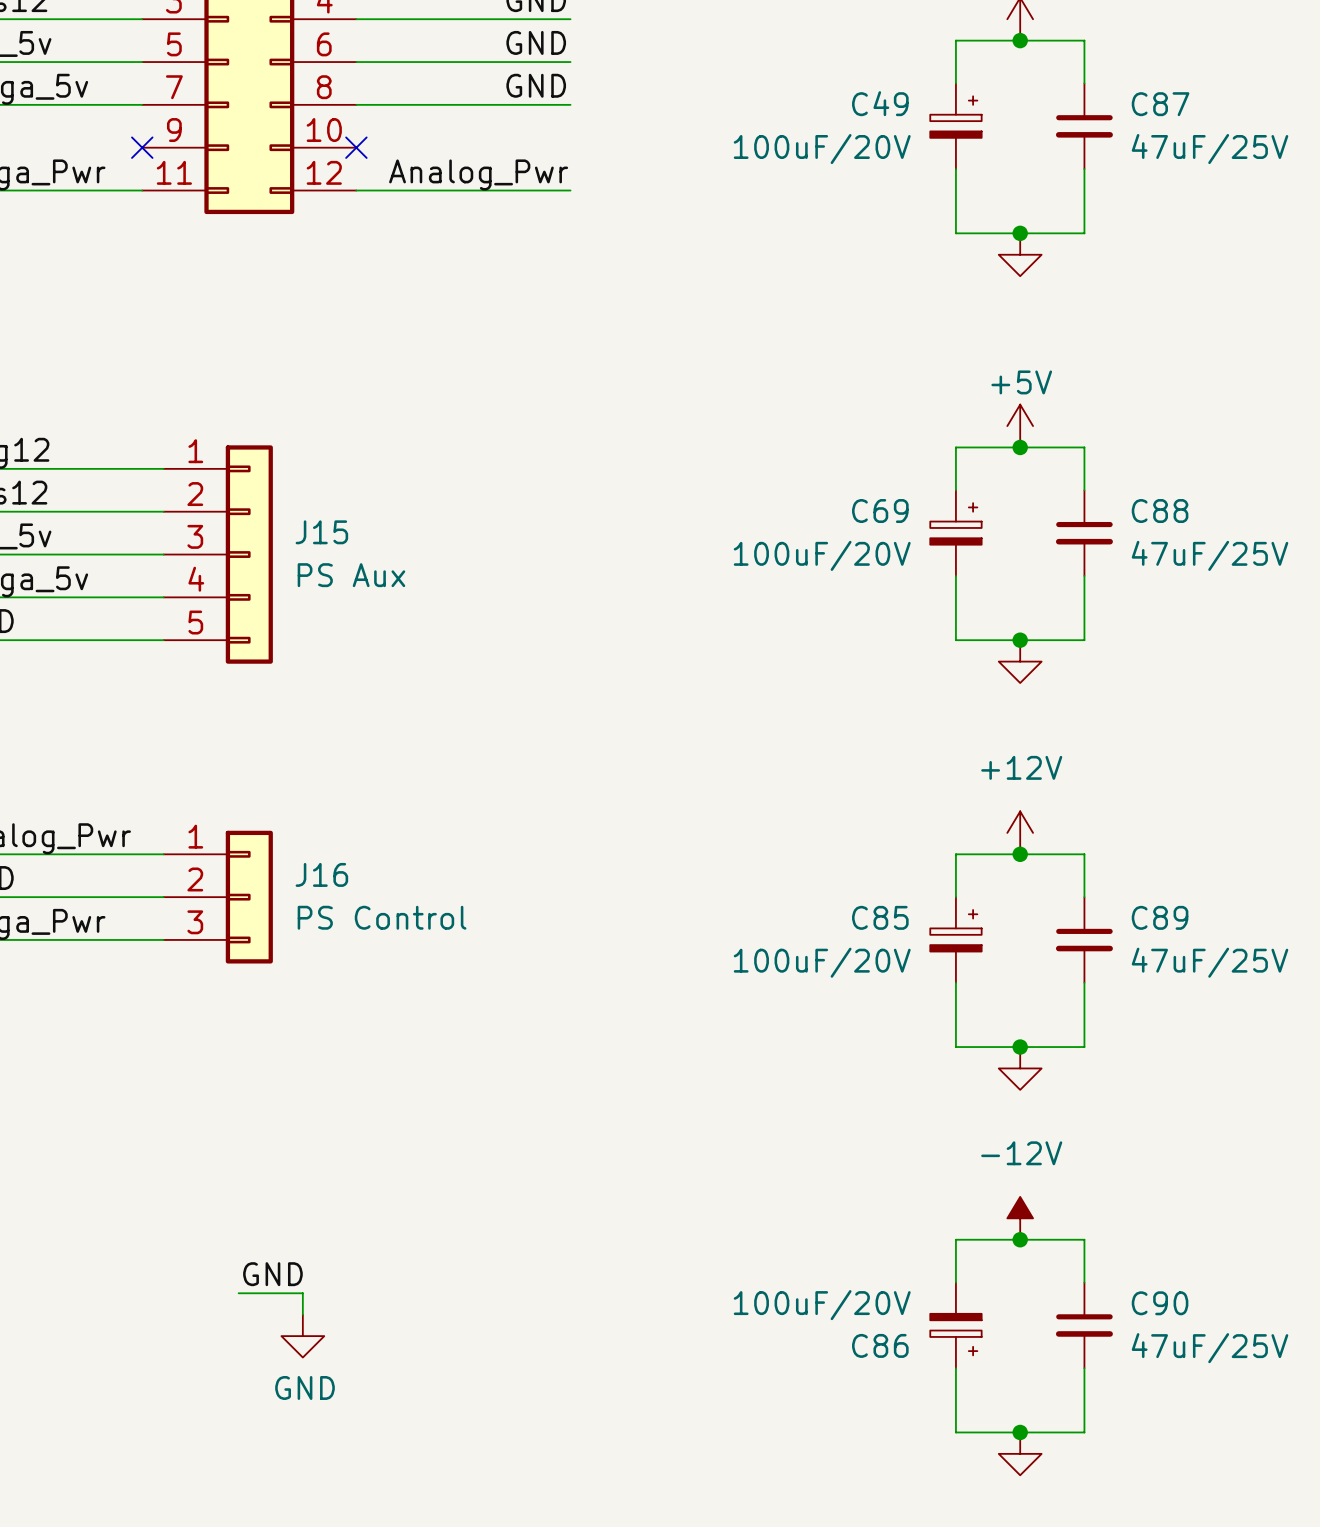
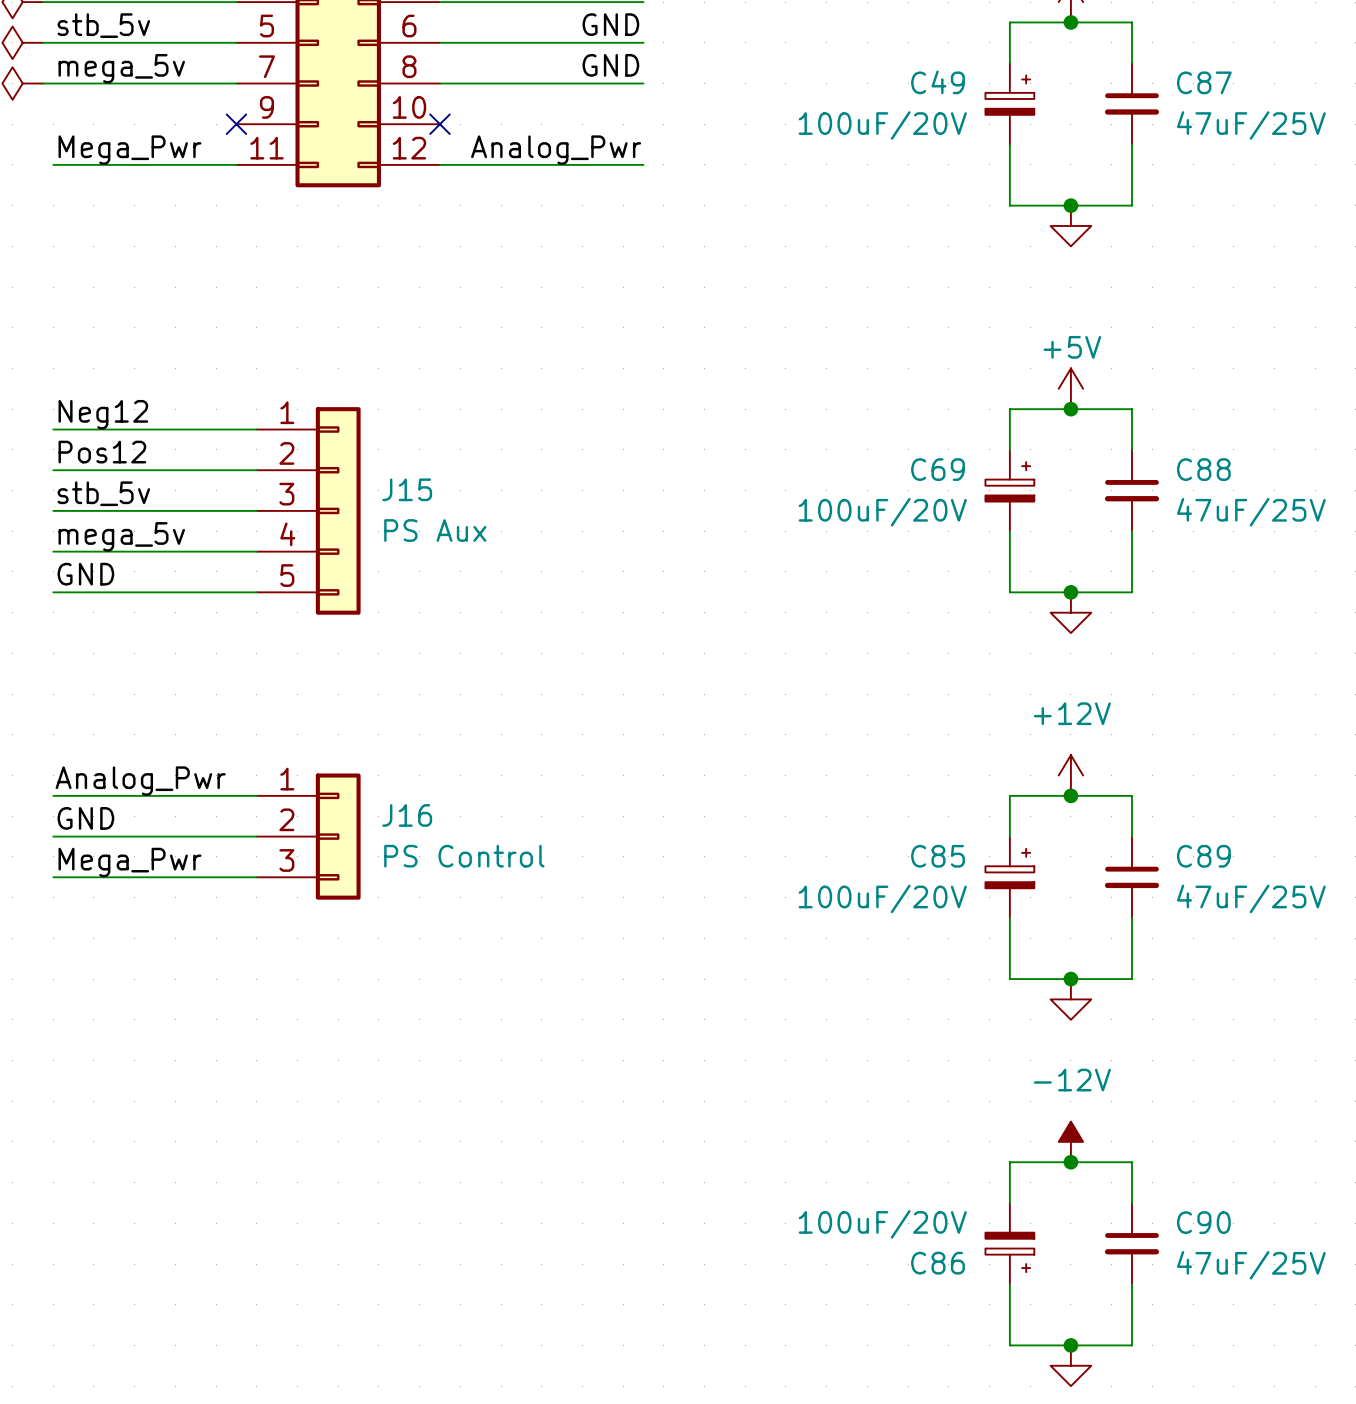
label: GND (272, 1274) -> none
wire: (238, 1293) (302, 1293) (302, 1314) -> none
power symbol: GND (302, 1336) -> none

